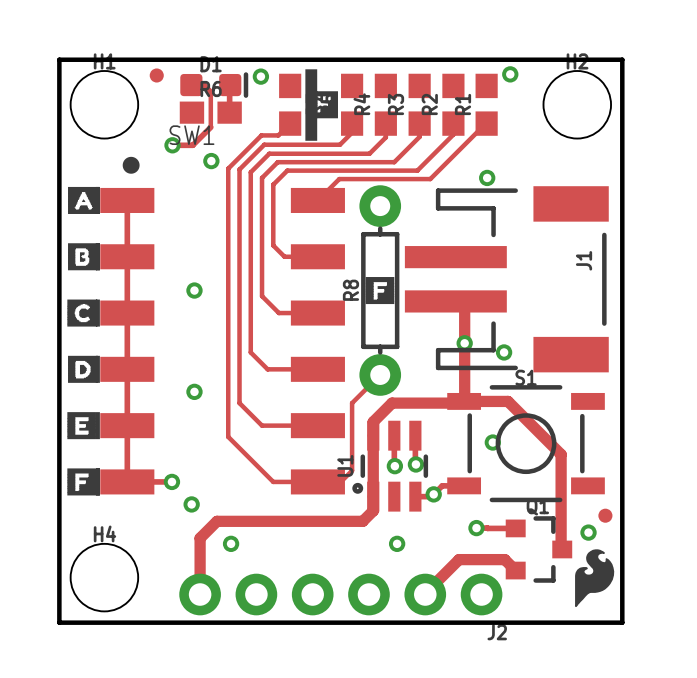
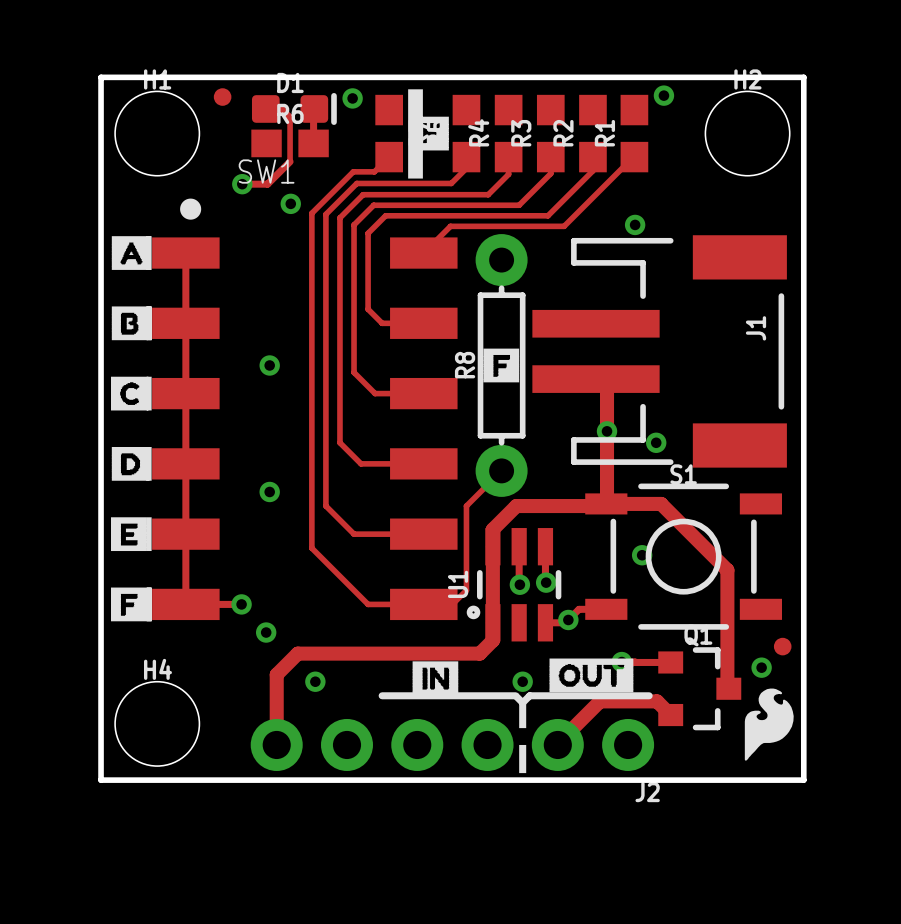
drawing: none -> [549, 658, 634, 693]
drawing: none -> [412, 661, 459, 696]
line: none -> (382, 695) (515, 695) (522, 702)
line: none -> (649, 695) (529, 695) (522, 702)
line: none -> (522, 702) (522, 773)

